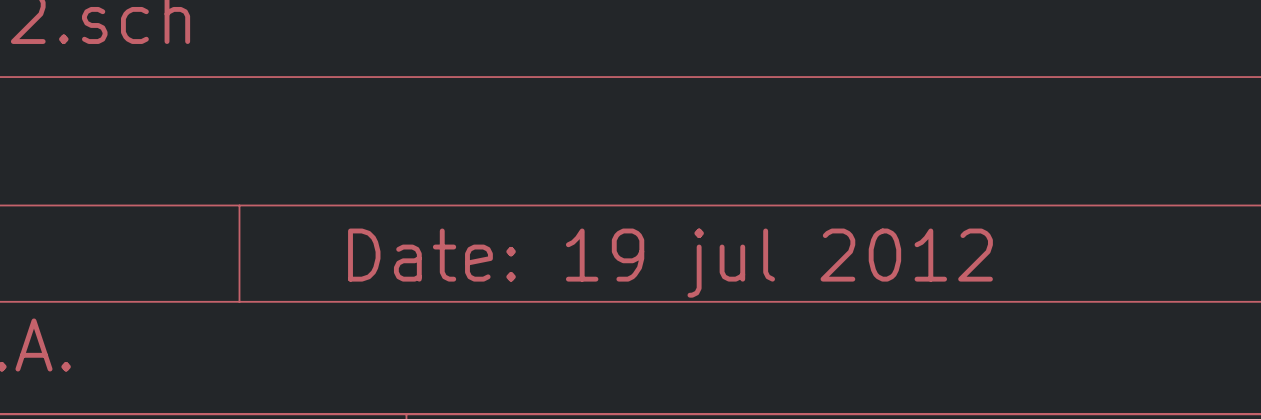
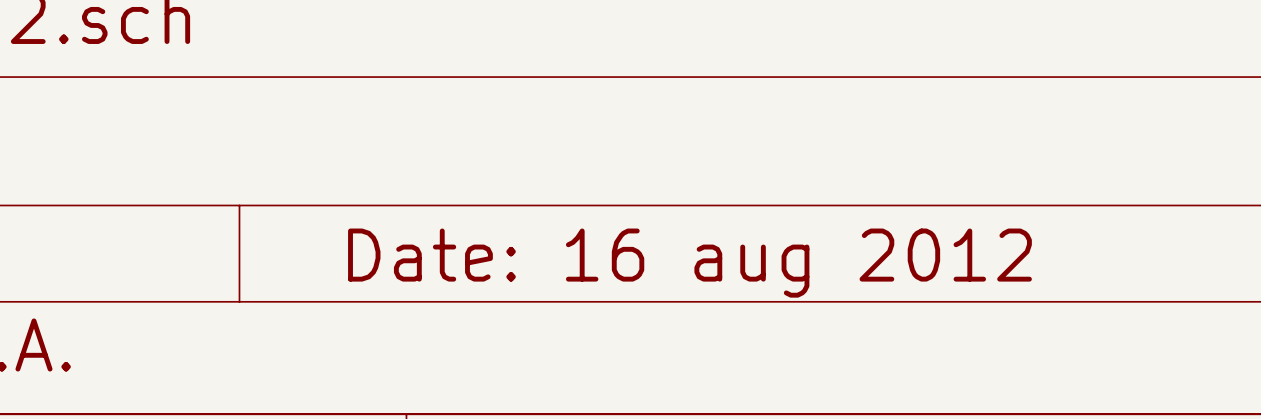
title block: Date: 19 jul 2012 (670, 263) -> Date: 16 aug 2012 (689, 263)

